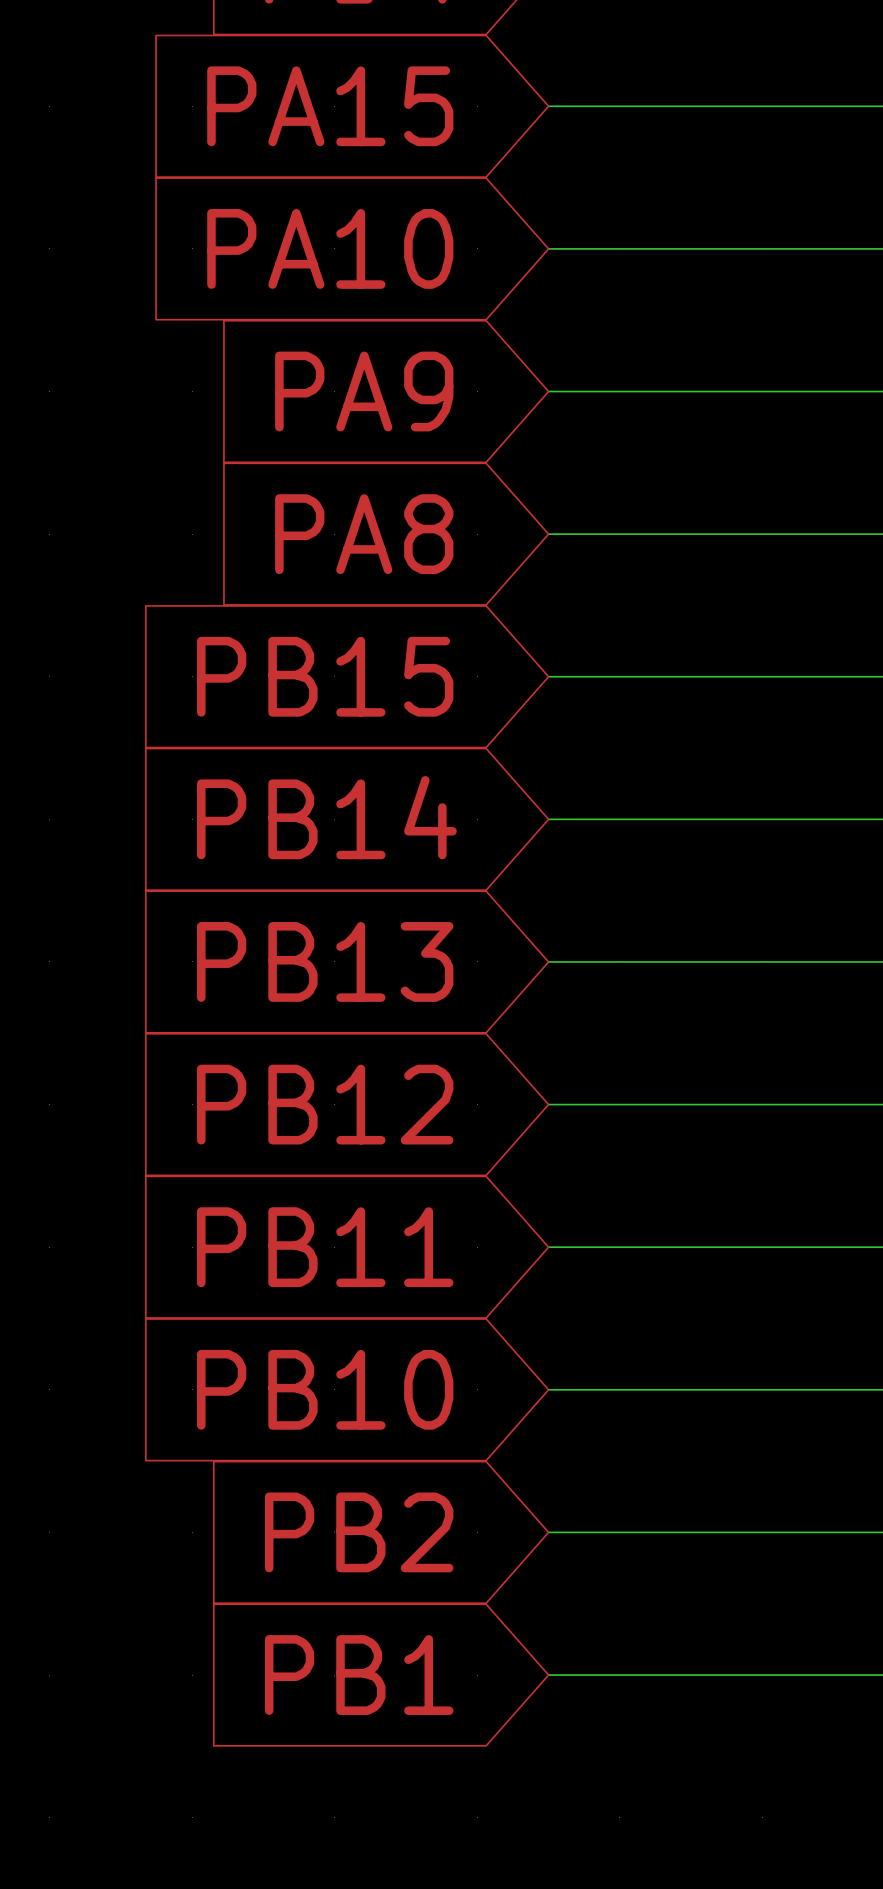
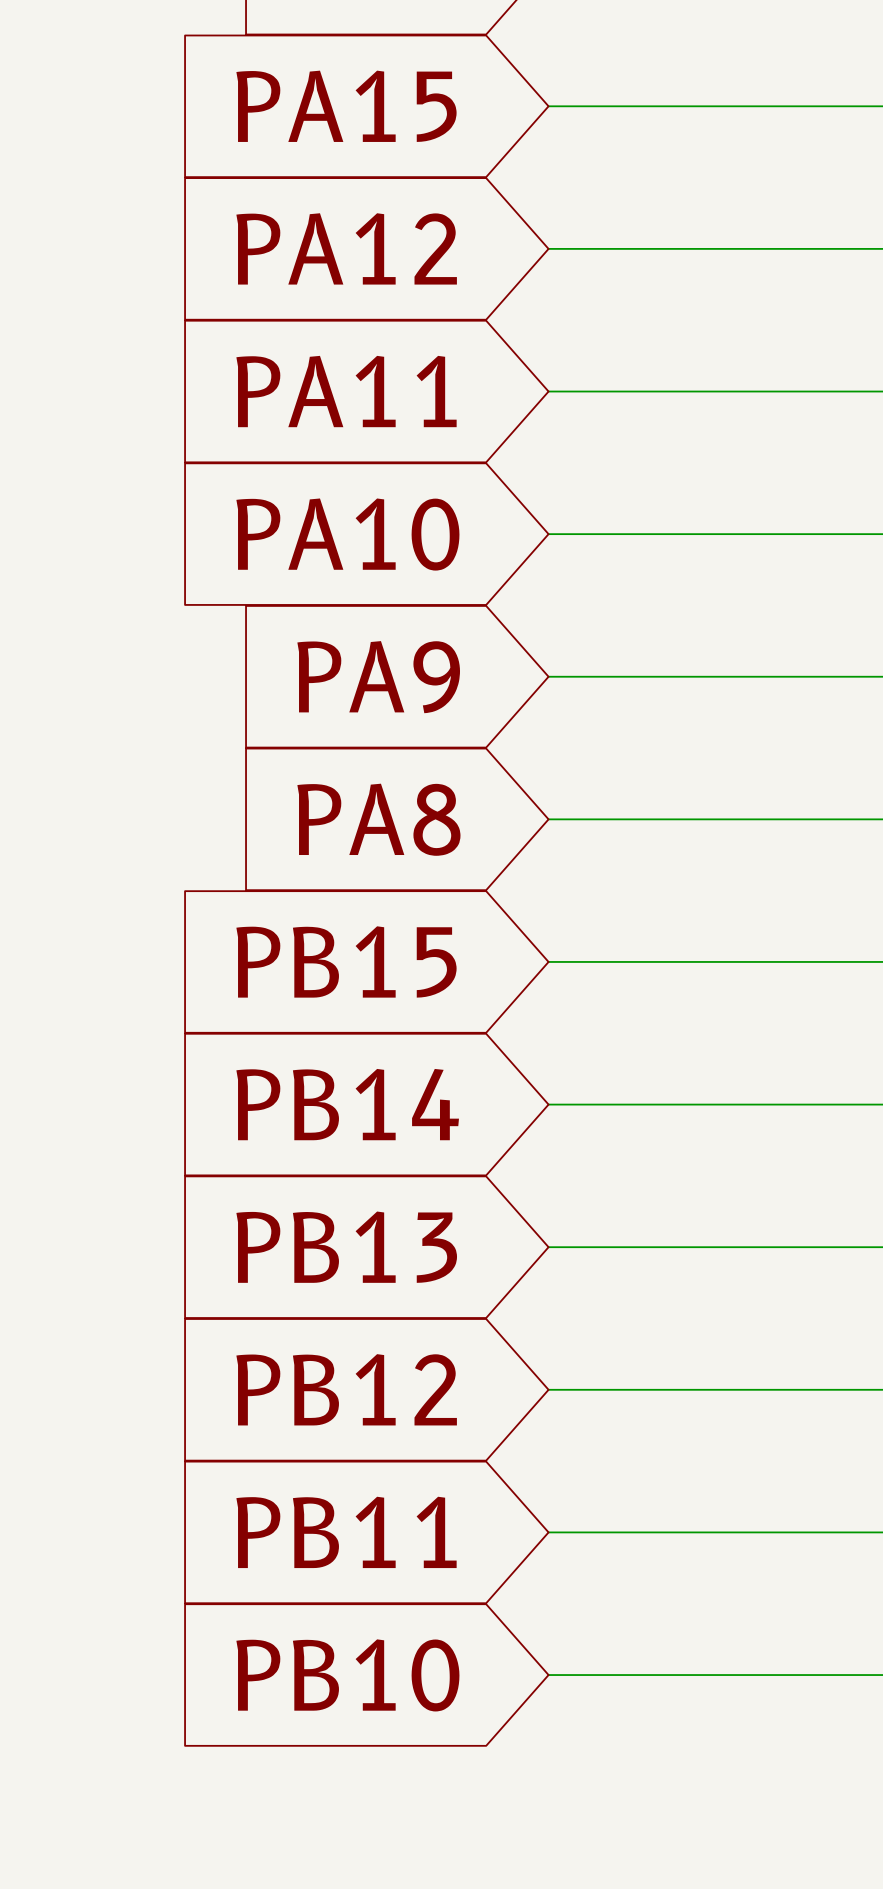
global label: PA10 (330, 248) -> PA12 (346, 248)
global label: PA9 (364, 391) -> PA11 (346, 391)
global label: PA8 (364, 534) -> PA10 (347, 534)
global label: PB15 (325, 676) -> PA9 (378, 677)
global label: PB14 (326, 817) -> PA8 (378, 819)
global label: PB13 (325, 961) -> PB15 (346, 961)
global label: PB12 (325, 1104) -> PB14 (347, 1104)
global label: PB11 (325, 1247) -> PB13 (346, 1247)
global label: PB10 (325, 1389) -> PB12 (346, 1389)
global label: PB2 (359, 1532) -> PB11 (346, 1532)
global label: PB1 (359, 1675) -> PB10 (347, 1675)

